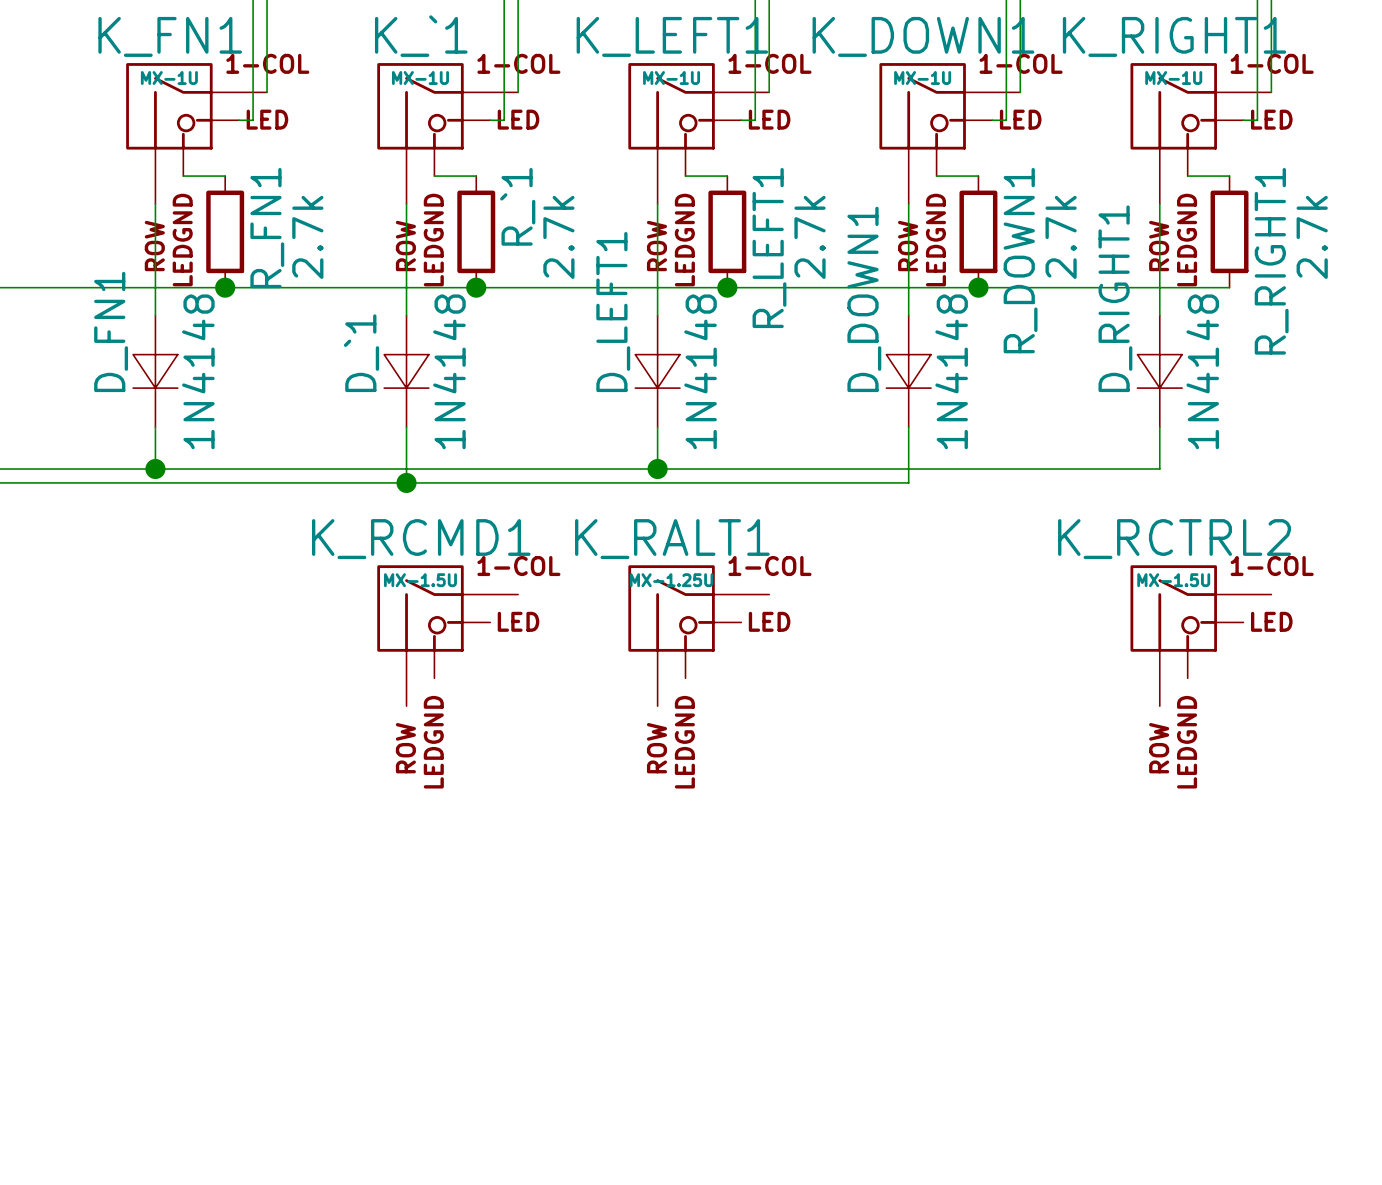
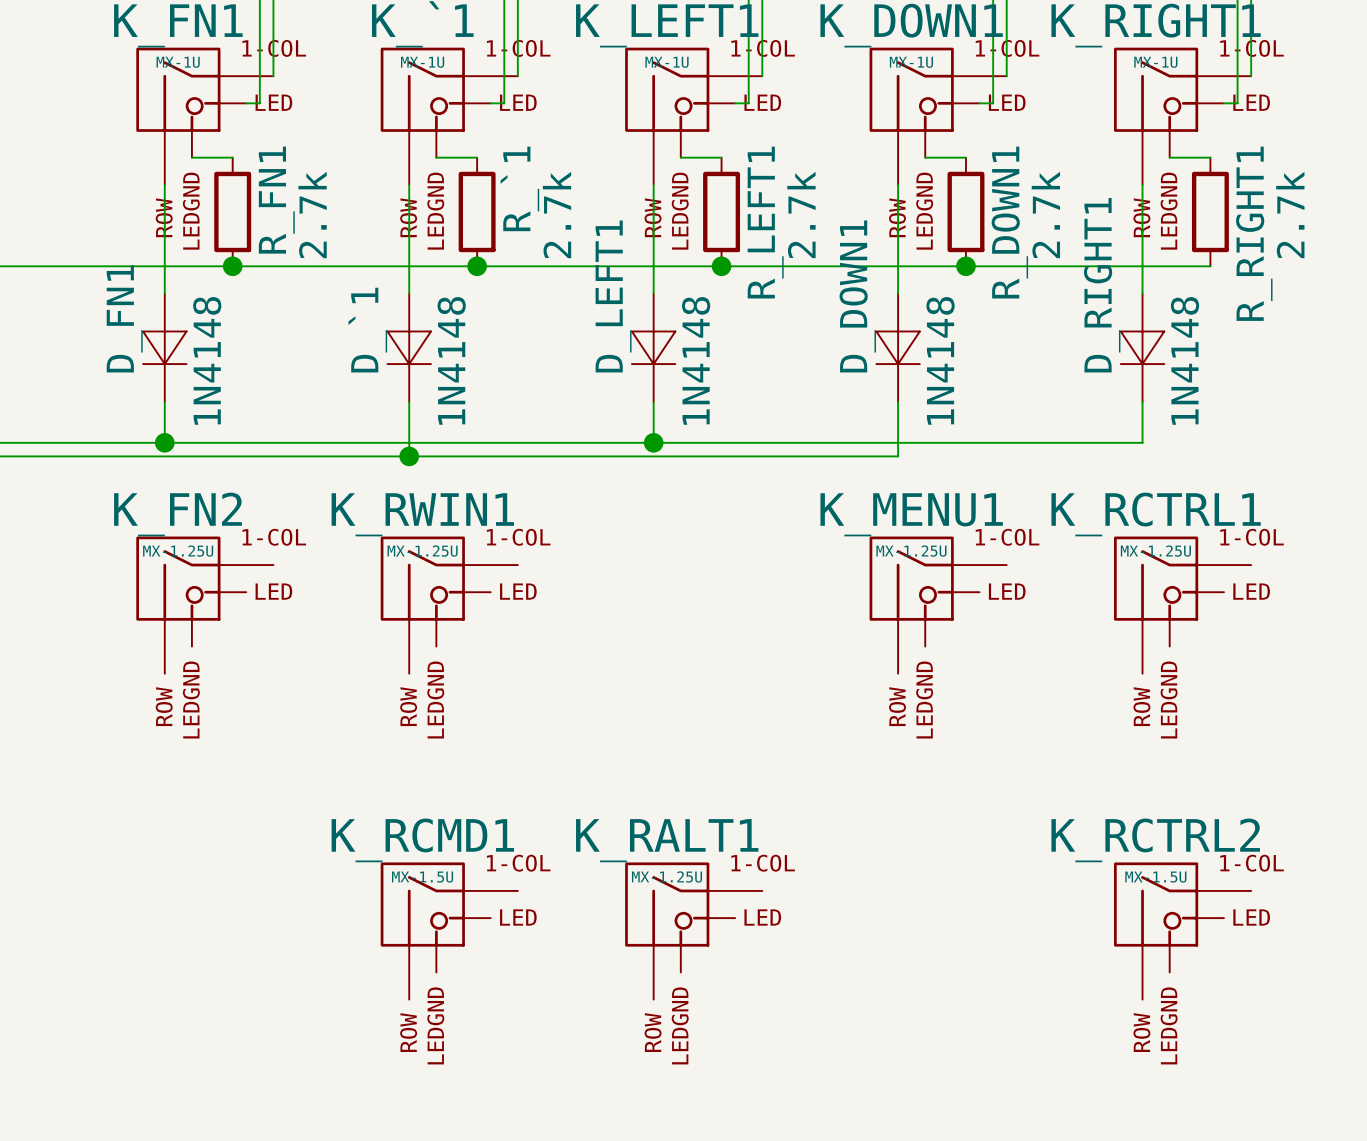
K_RCMD1 name: K_RCMD1 (421, 539) -> K_RWIN1 (422, 514)
K_RCTRL2 name: K_RCTRL2 (1174, 539) -> K_RCTRL1 (1156, 514)
K_RCMD1 value: MX-1.5U (420, 580) -> MX-1.25U (422, 551)
K_RCTRL2 value: MX-1.5U (1173, 580) -> MX-1.25U (1155, 551)
K_FN2: none -> MX-1.25U (204, 605)
K_RALT1 position: (698, 635) -> (693, 931)
K_MENU1: none -> MX-1.25U (938, 605)
K_RCMD1: none -> MX-1.5U (449, 931)
K_RCTRL2: none -> MX-1.5U (1182, 931)

